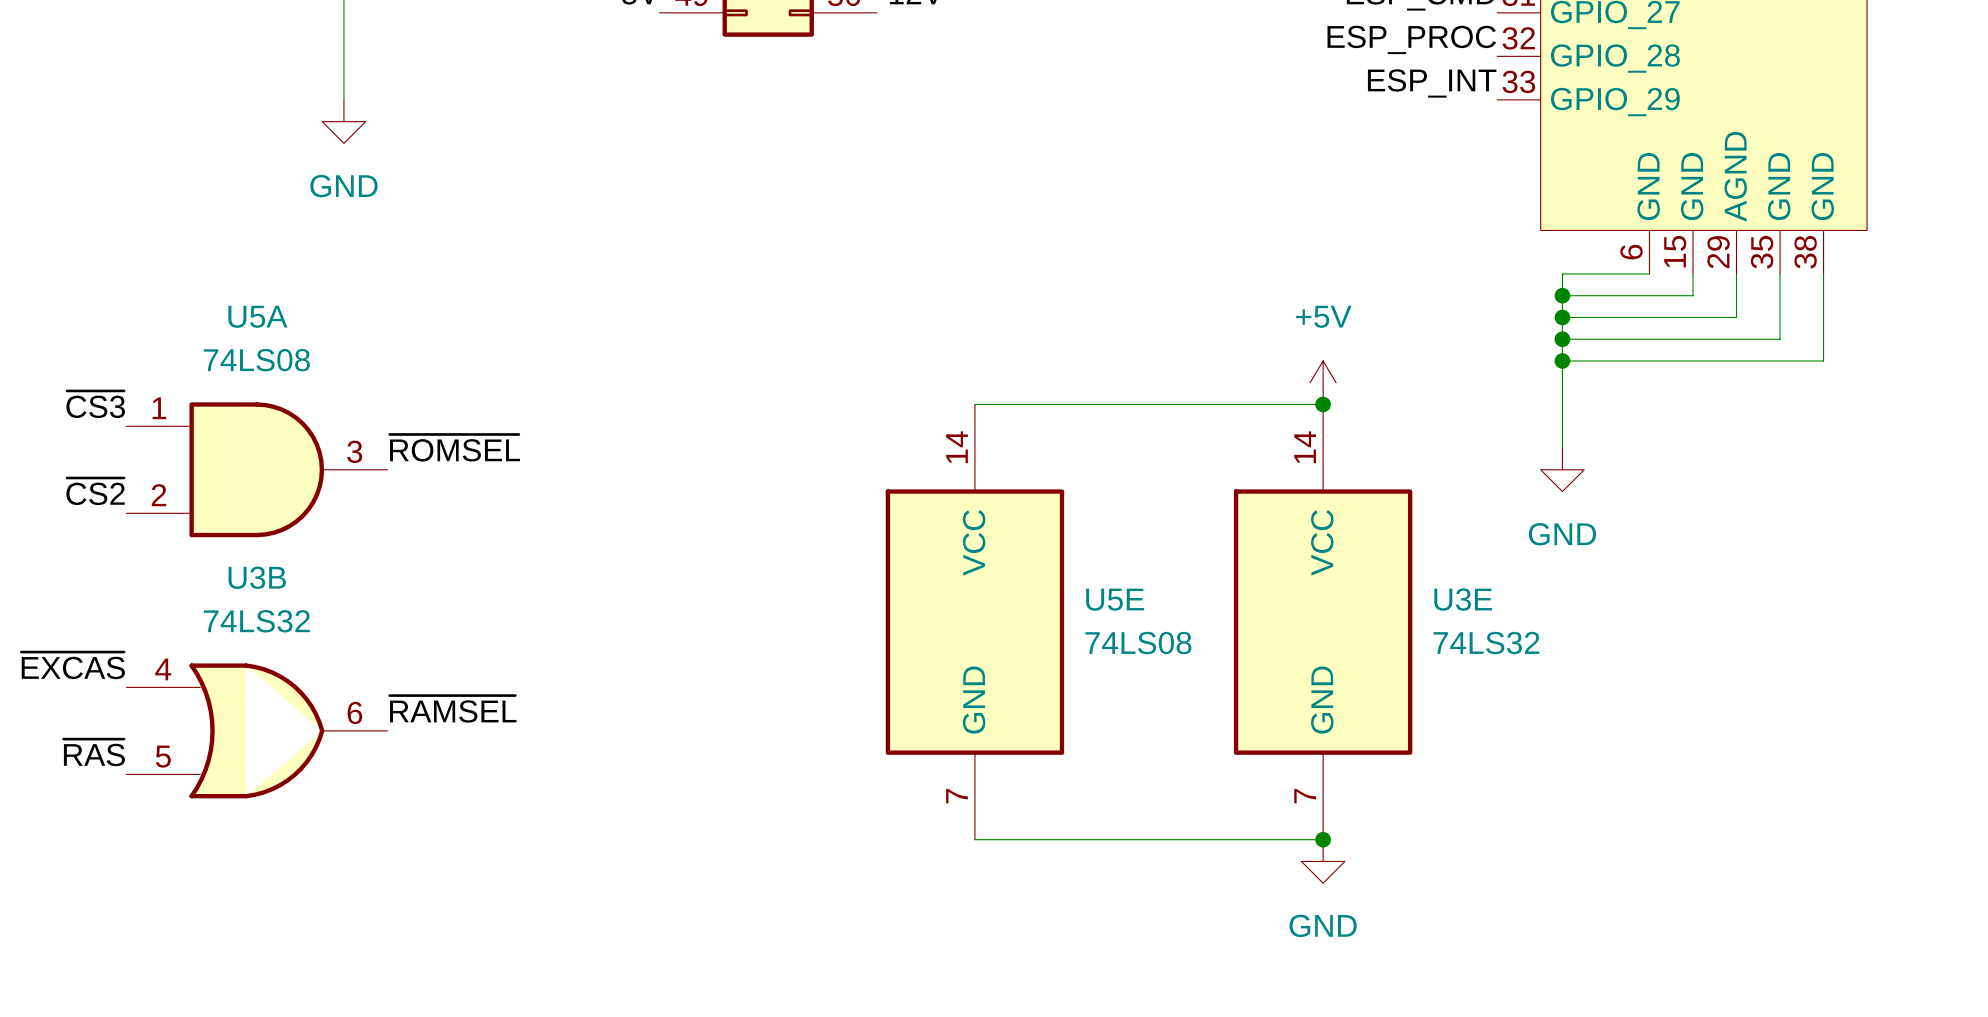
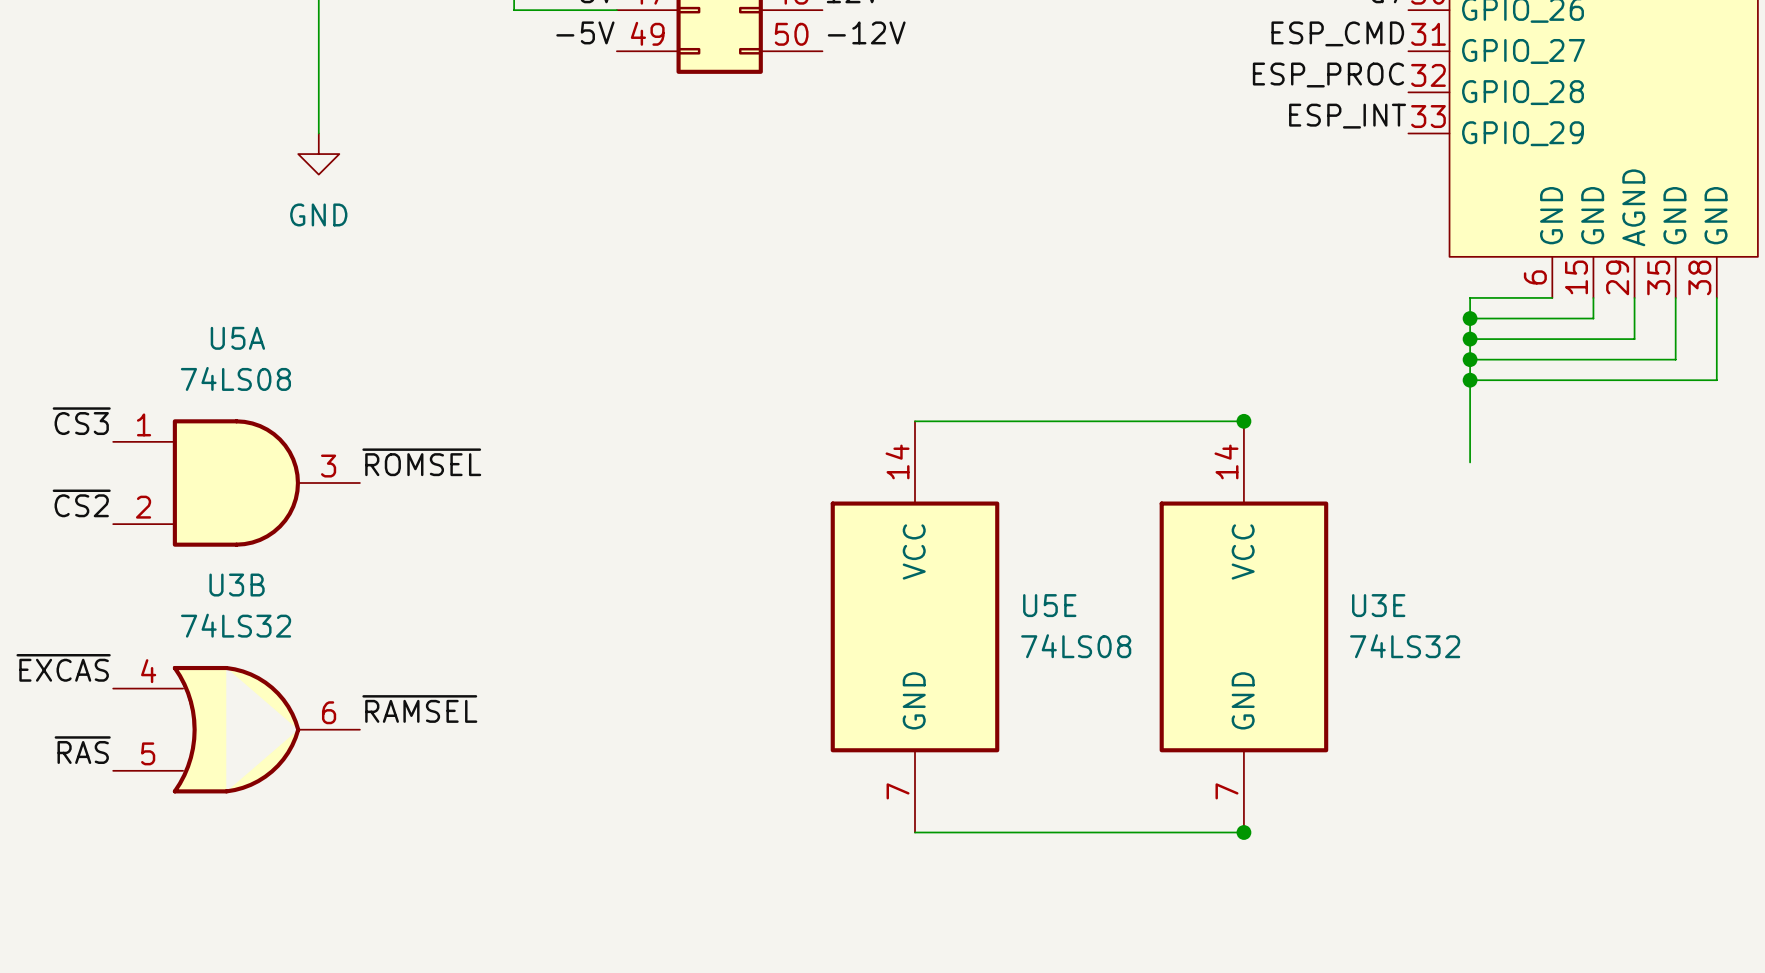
power symbol: +5V (1323, 382) -> none
power symbol: GND (1562, 469) -> none
power symbol: GND (1323, 861) -> none

